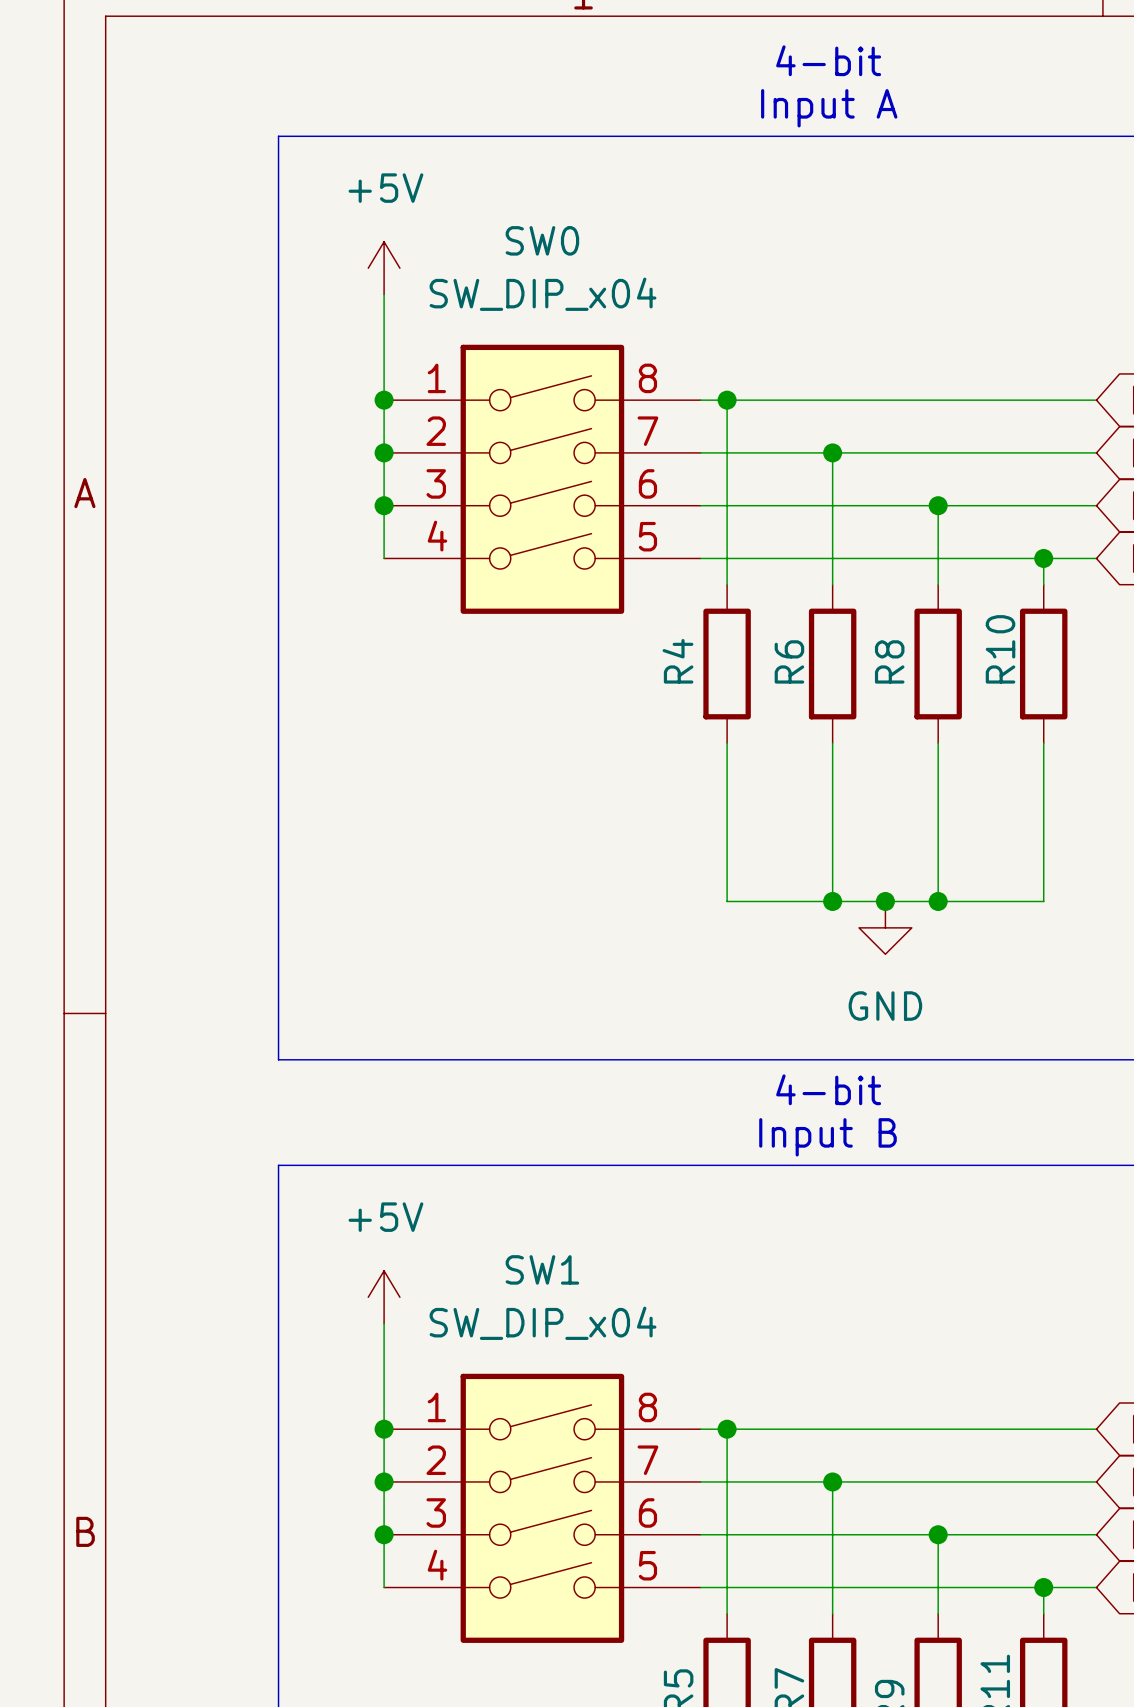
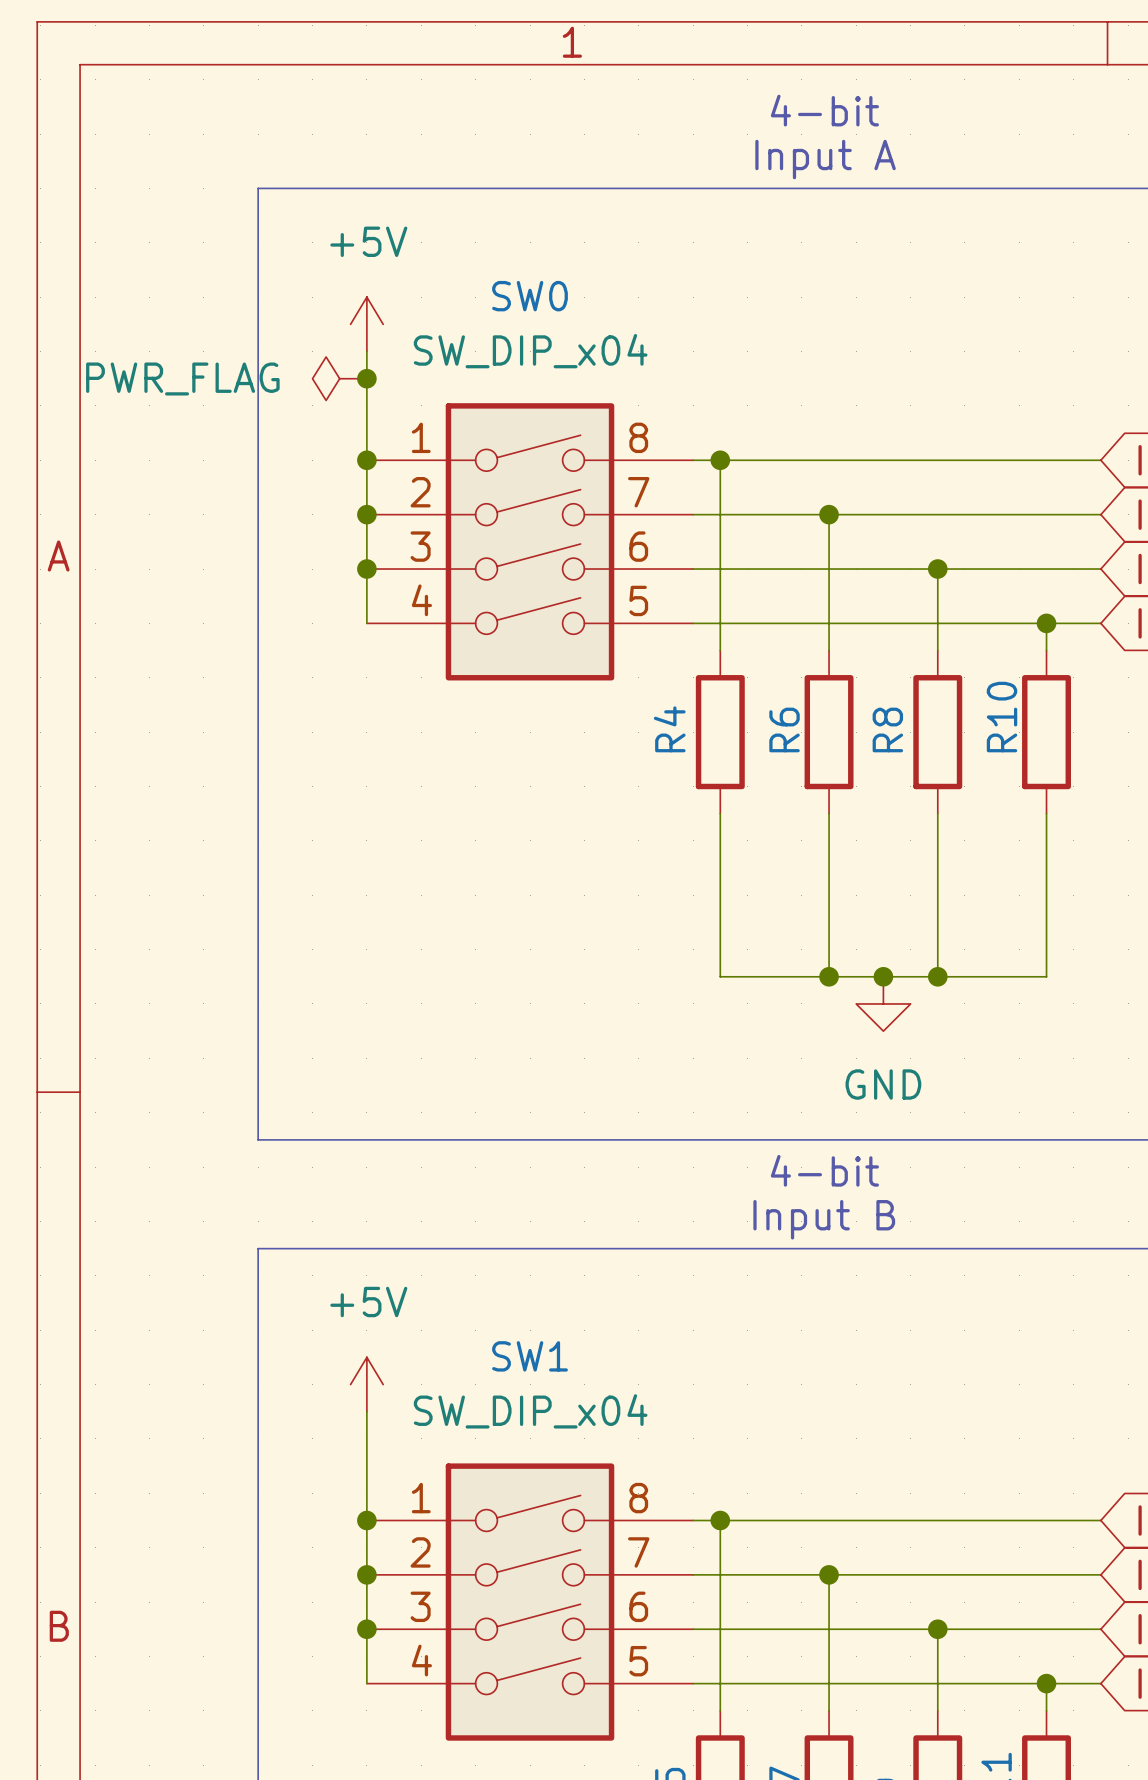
power symbol: none -> PWR_FLAG (339, 378)
junction: none -> (366, 378)

